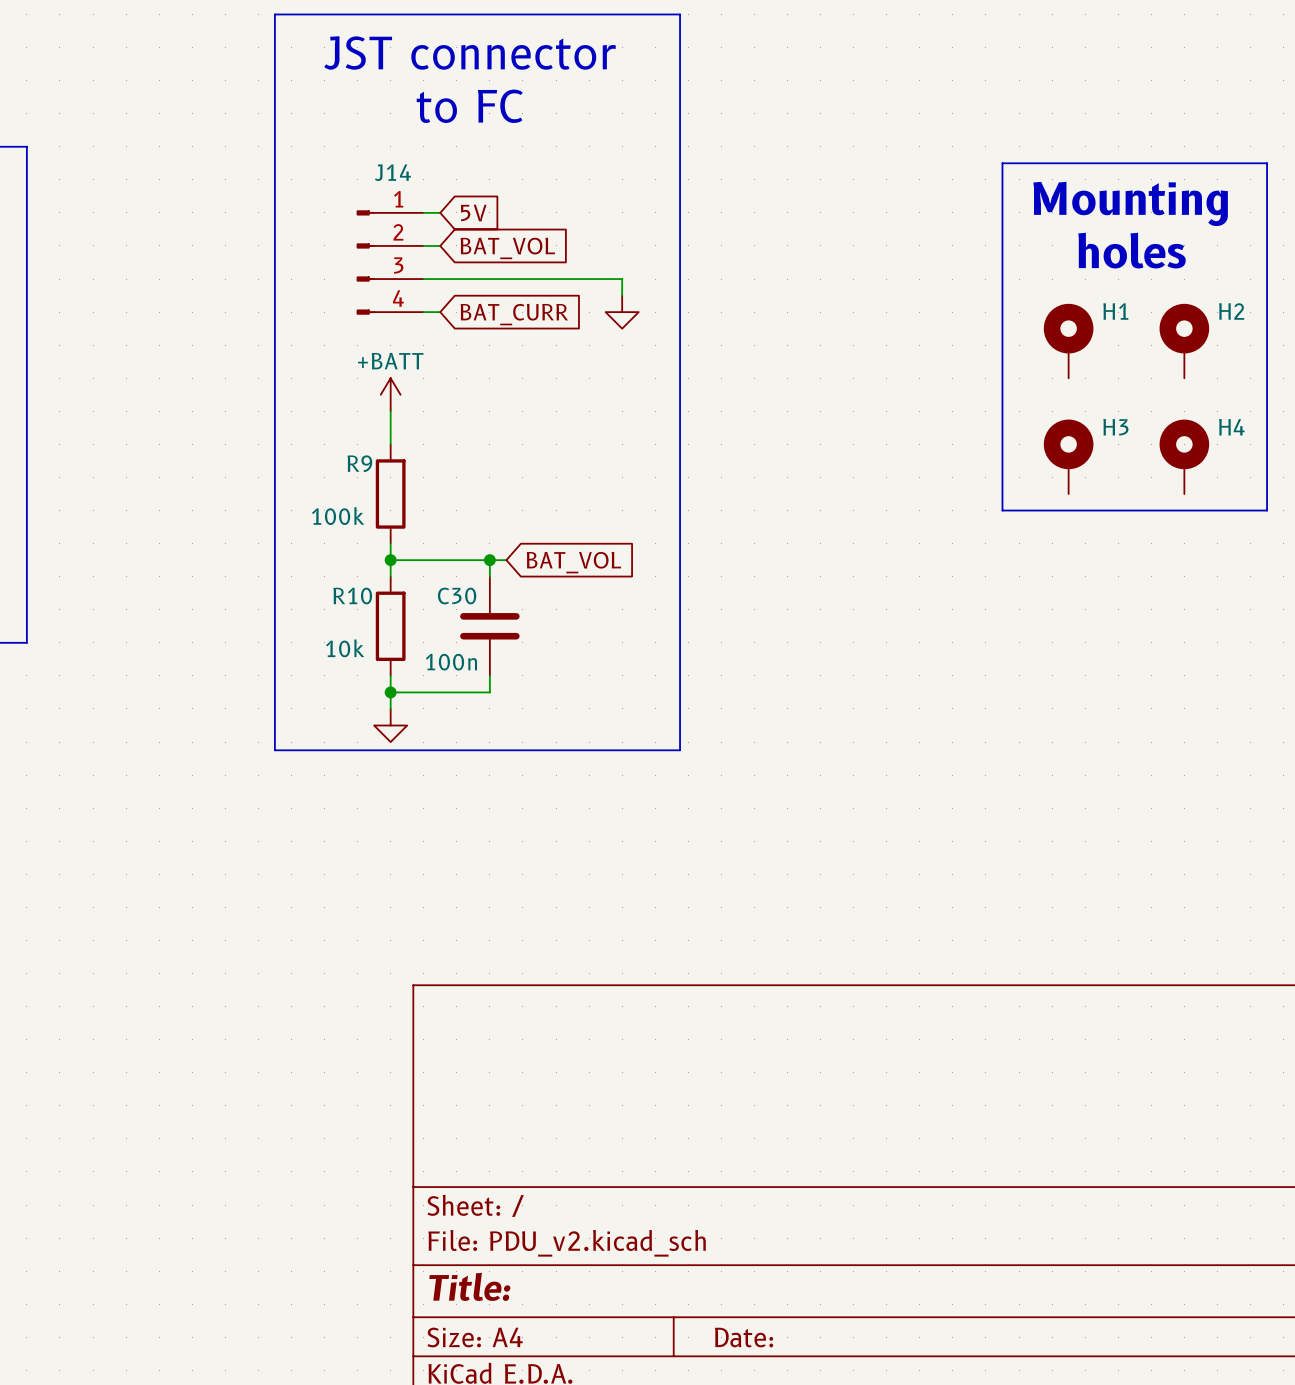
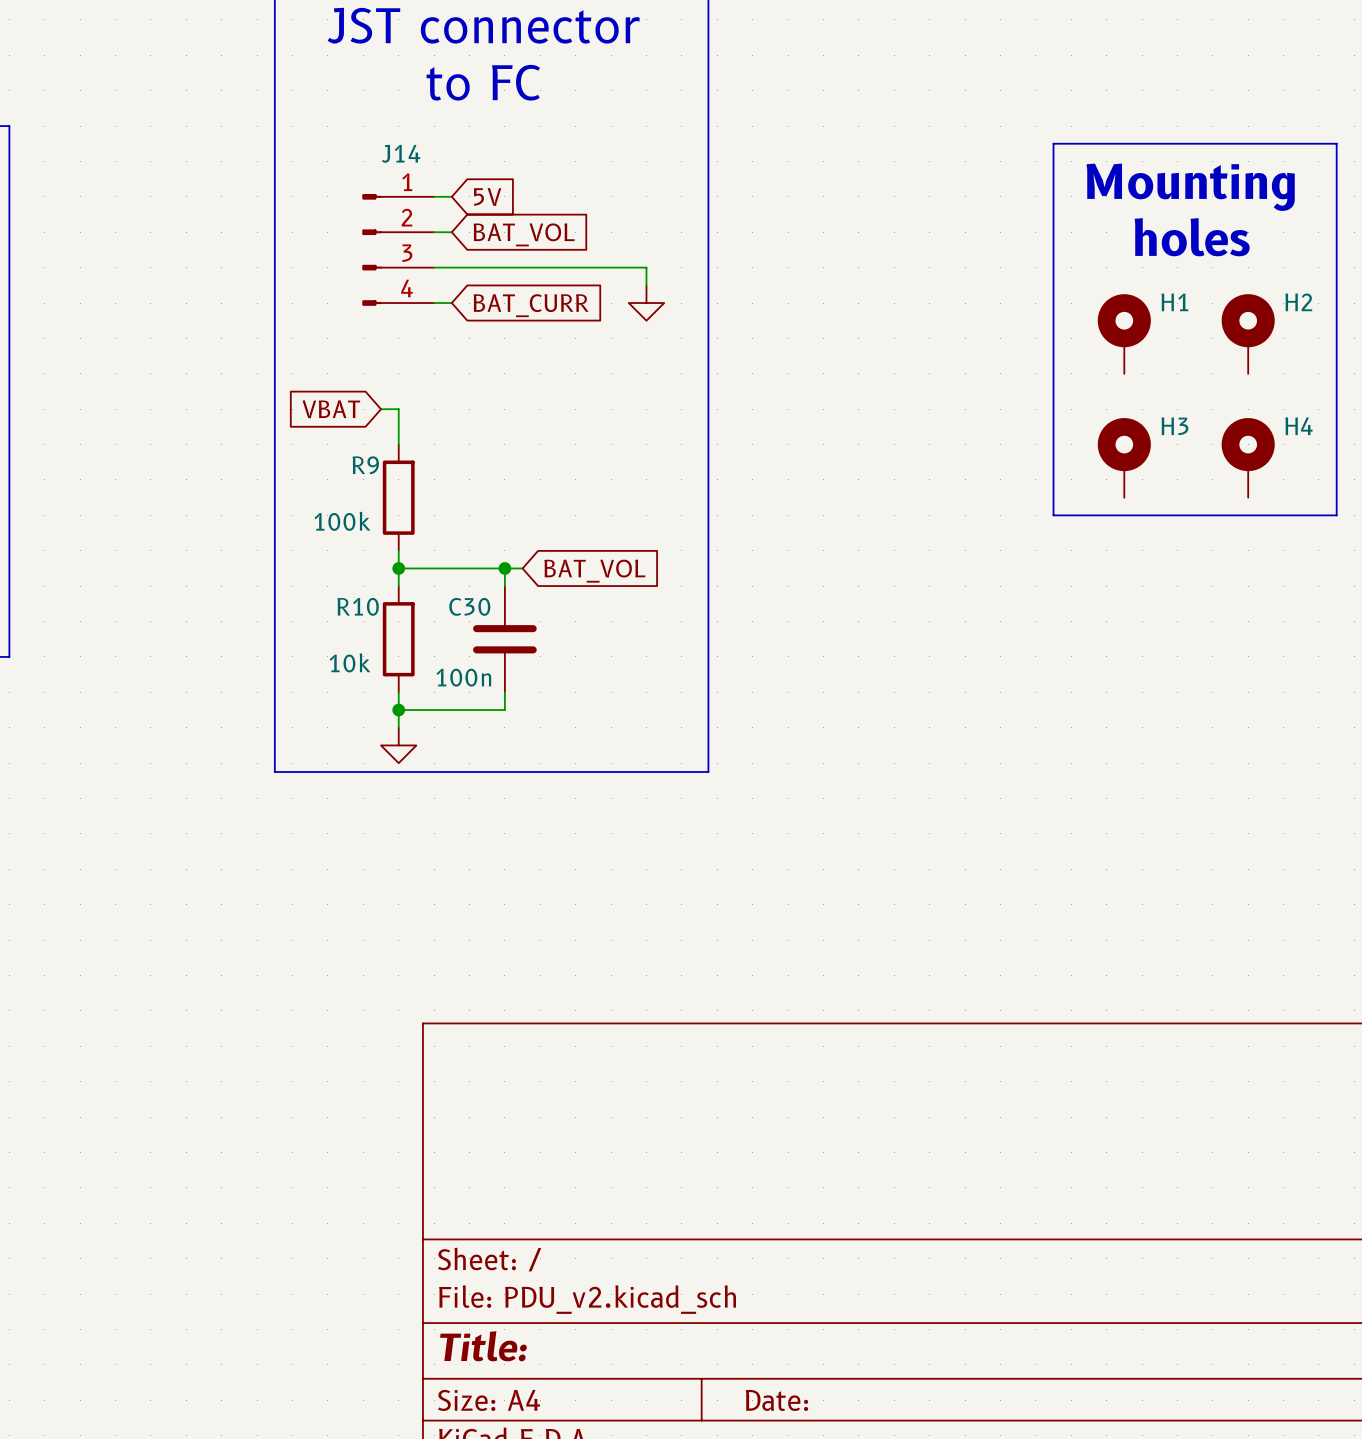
power symbol: +BATT (390, 394) -> none
global label: none -> VBAT (331, 409)
wire: none -> (381, 409) (398, 409)

